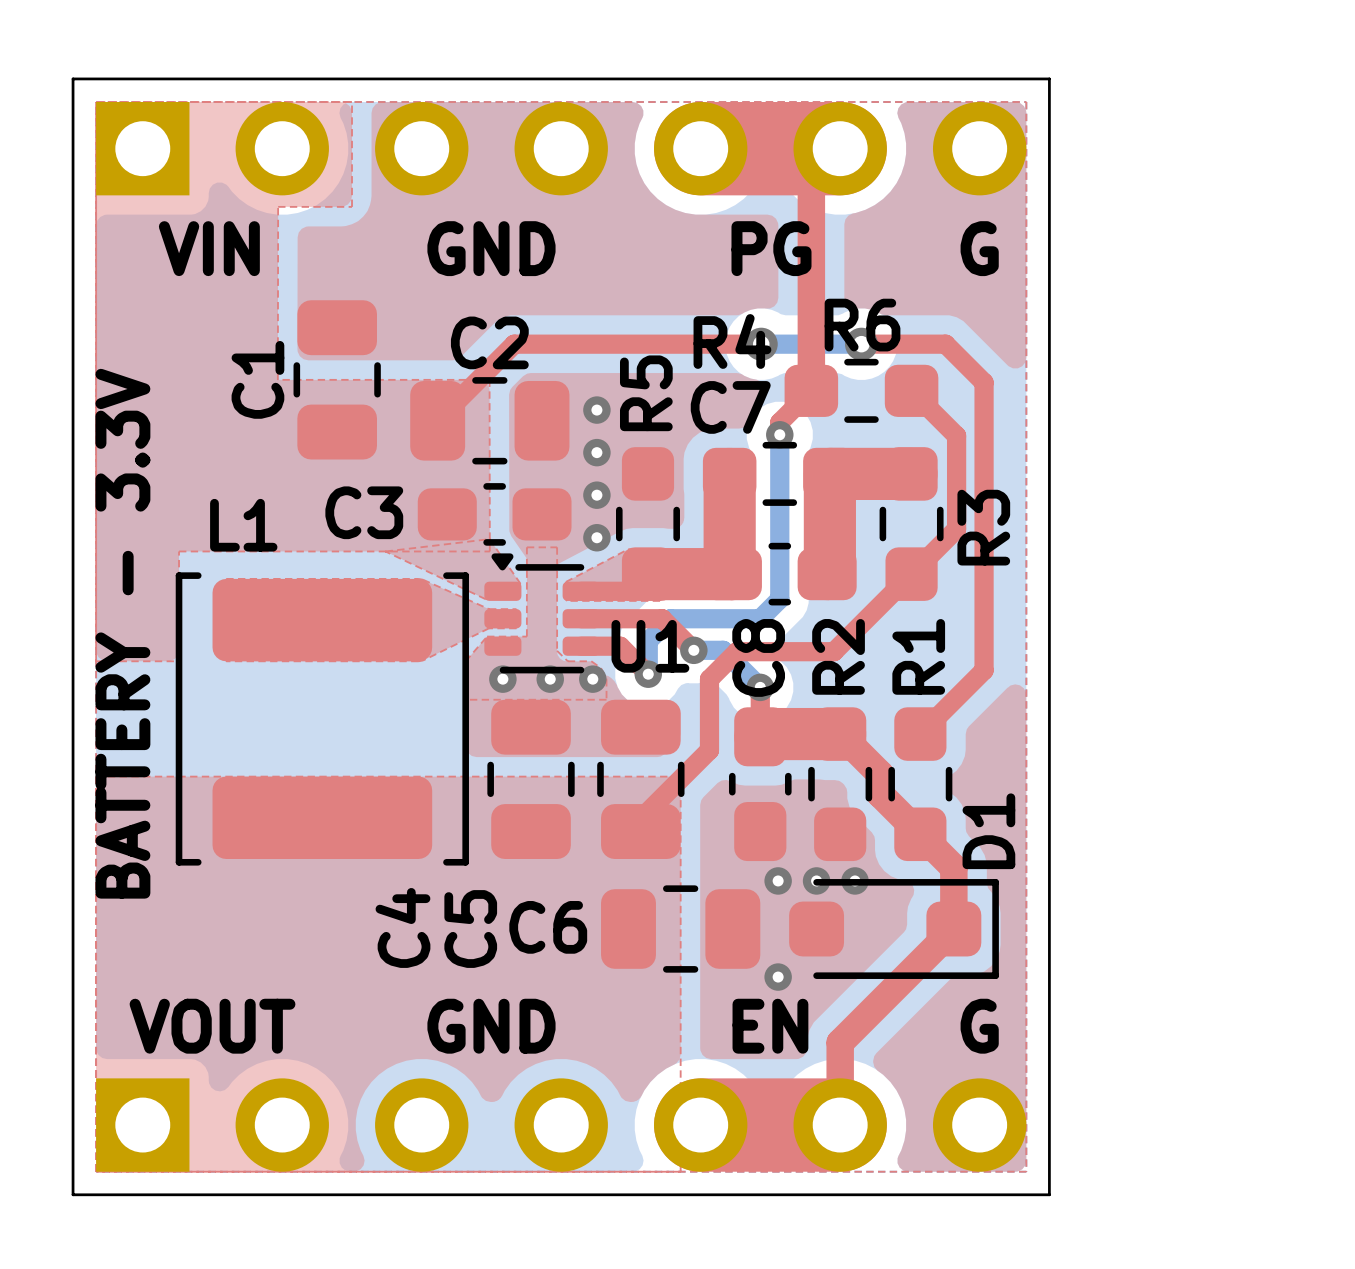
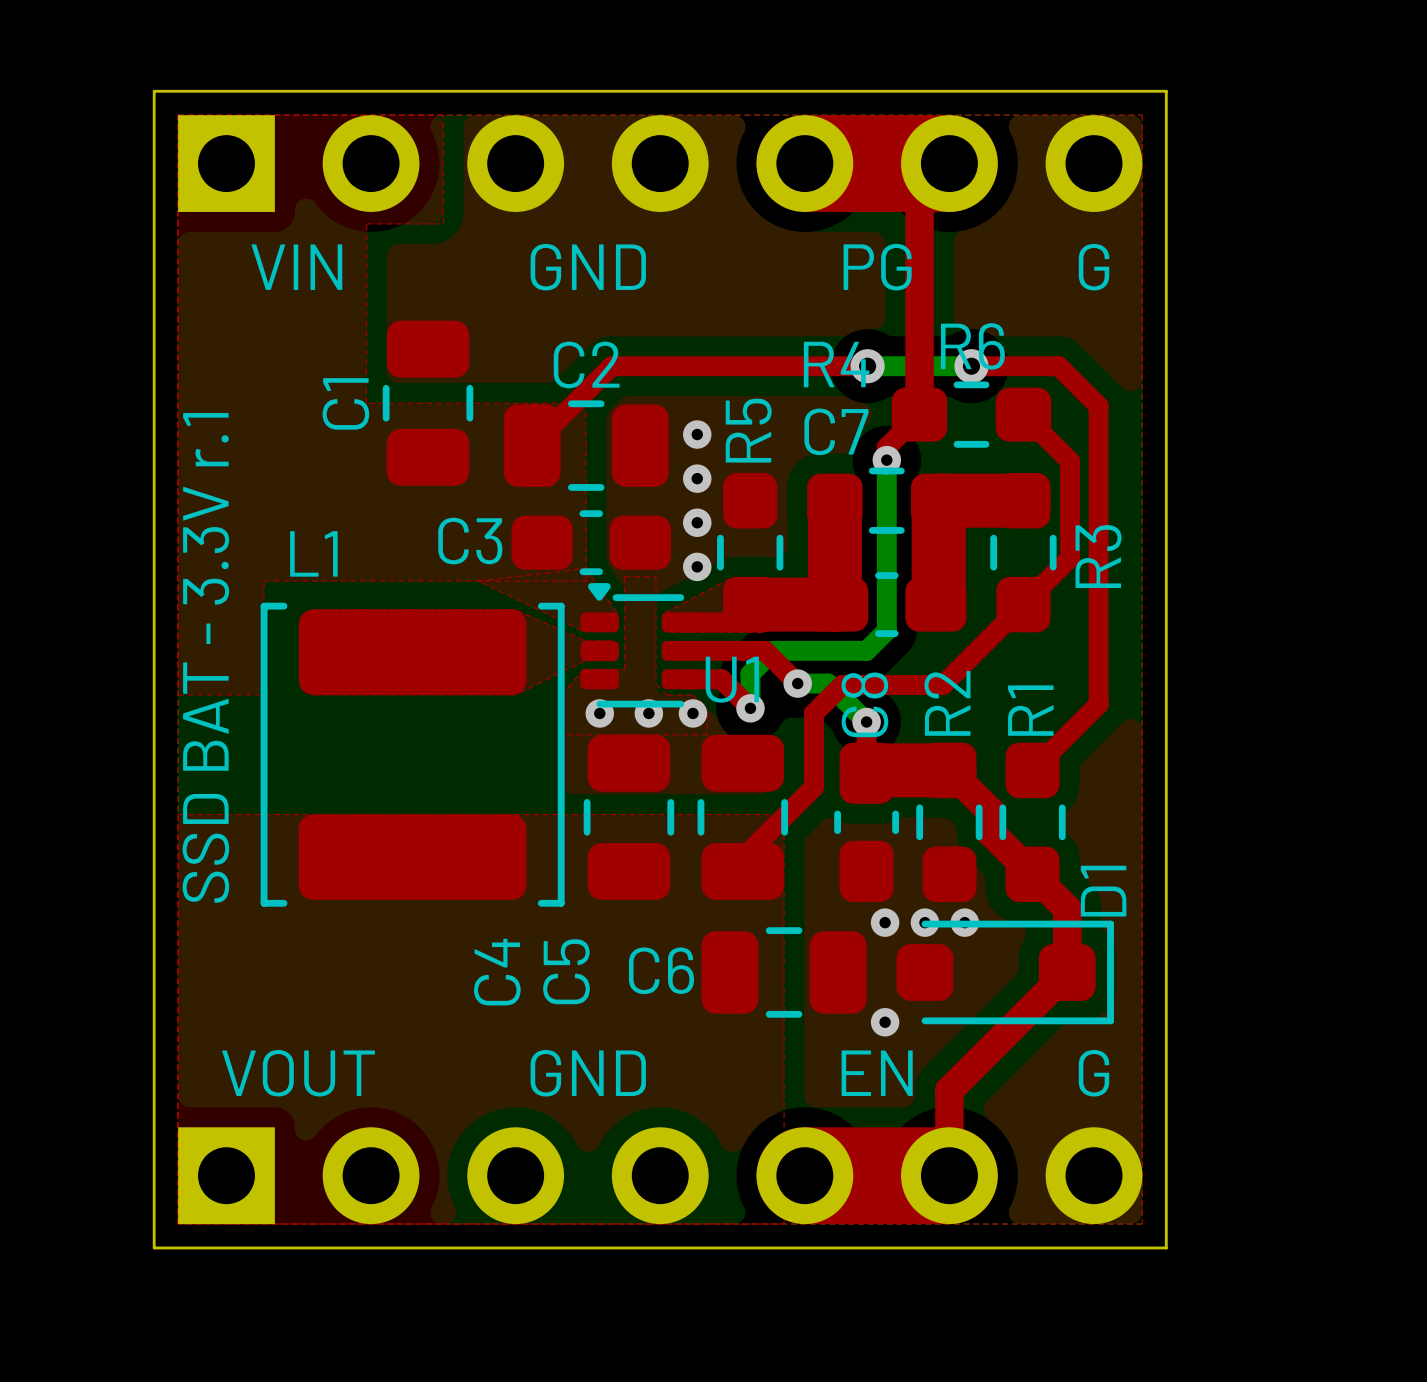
text: BATTERY - 3.3V (122, 633) -> SSD BAT - 3.3V r.1 (205, 657)

